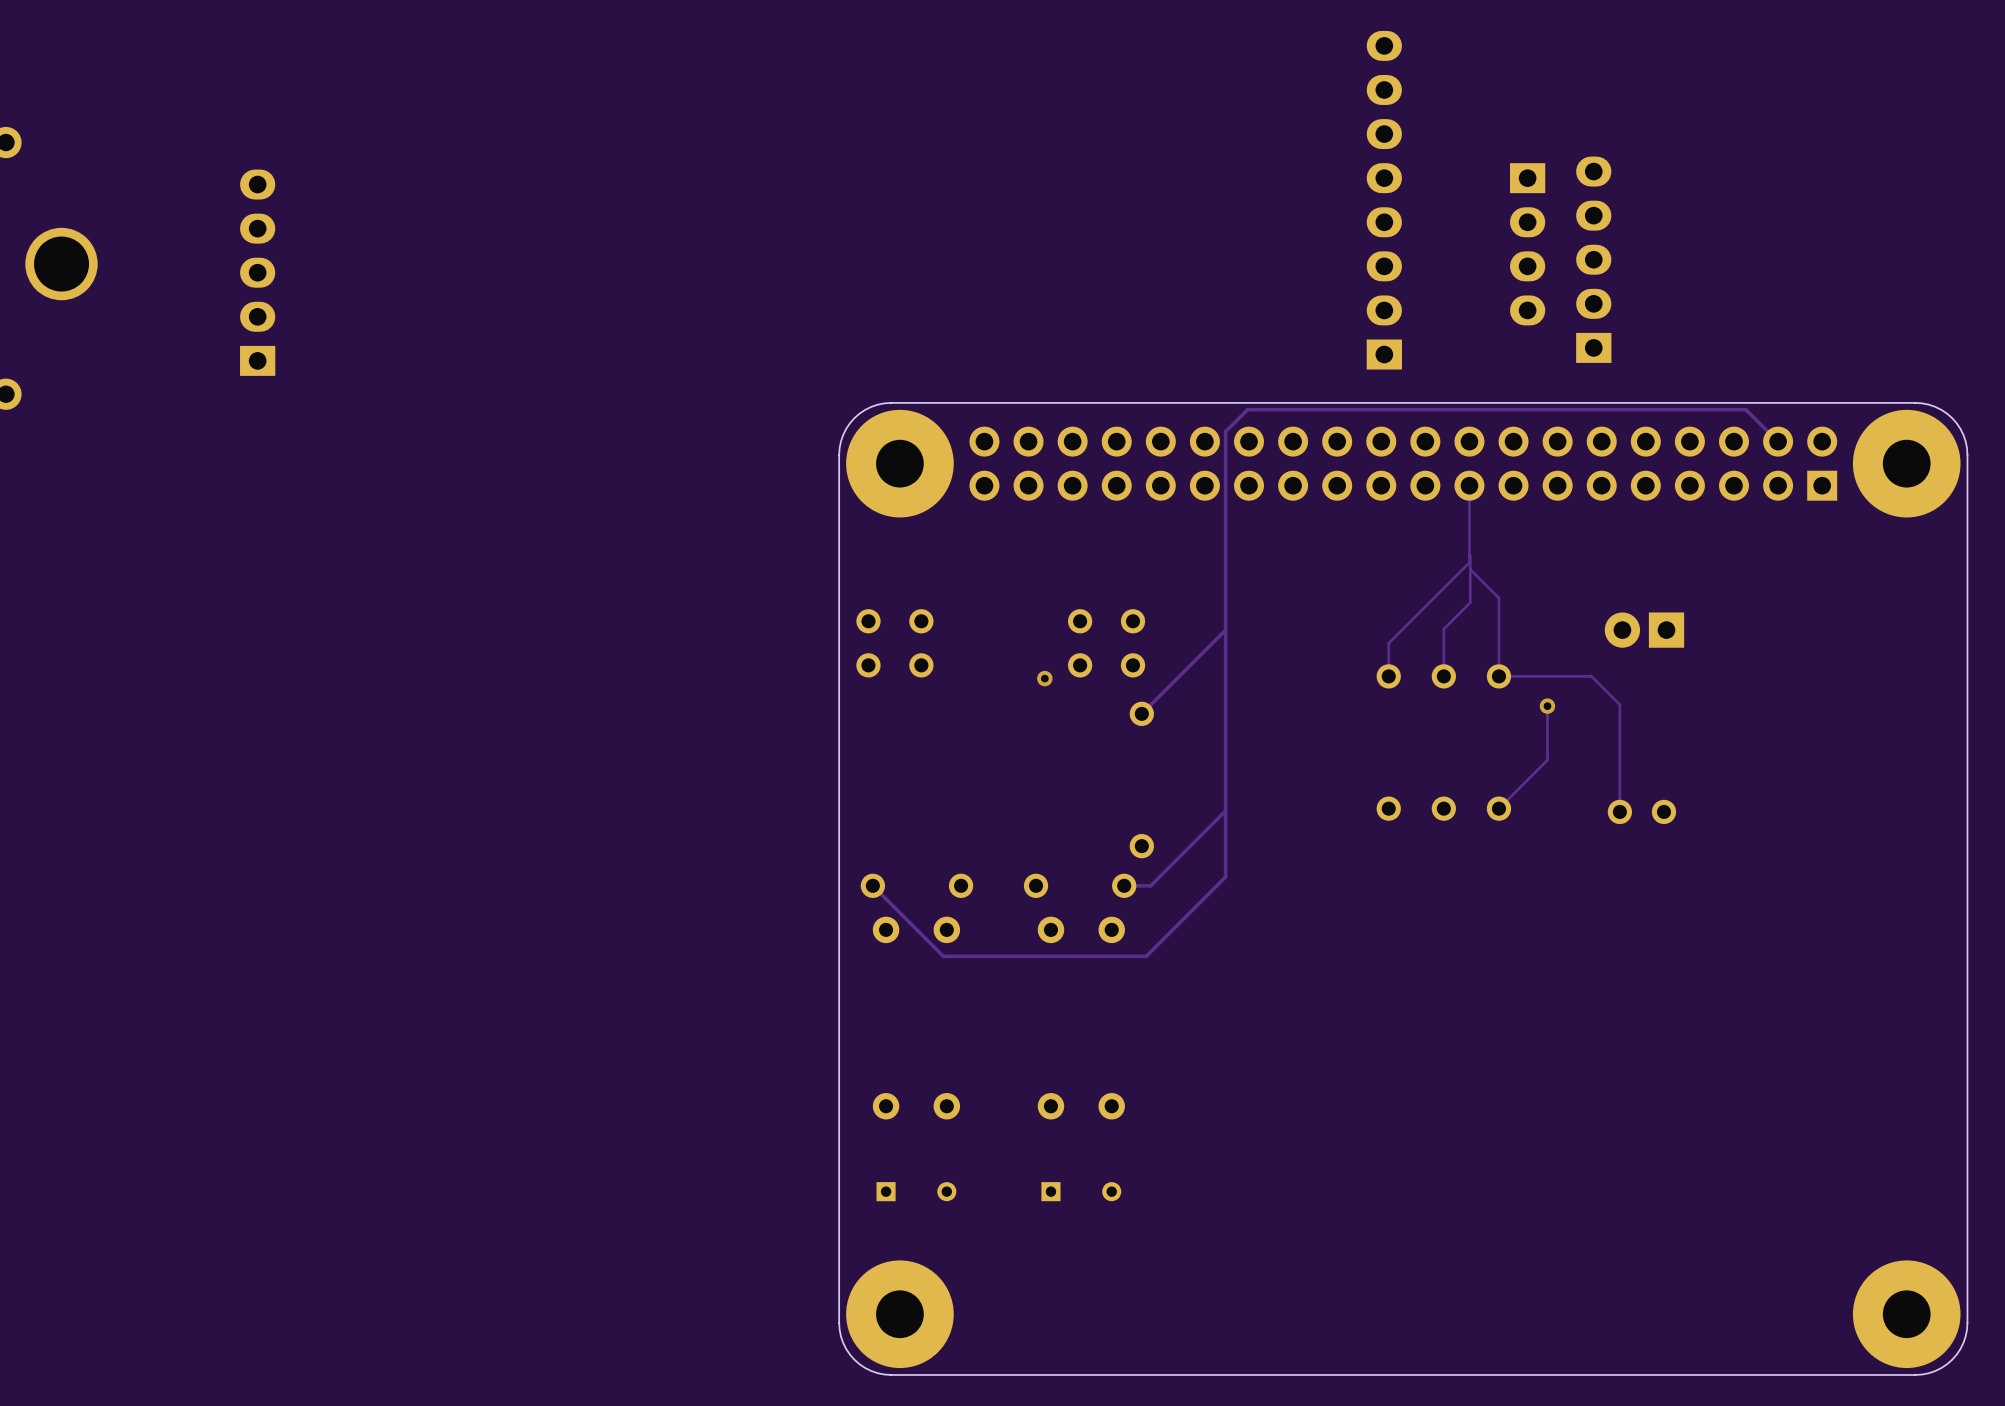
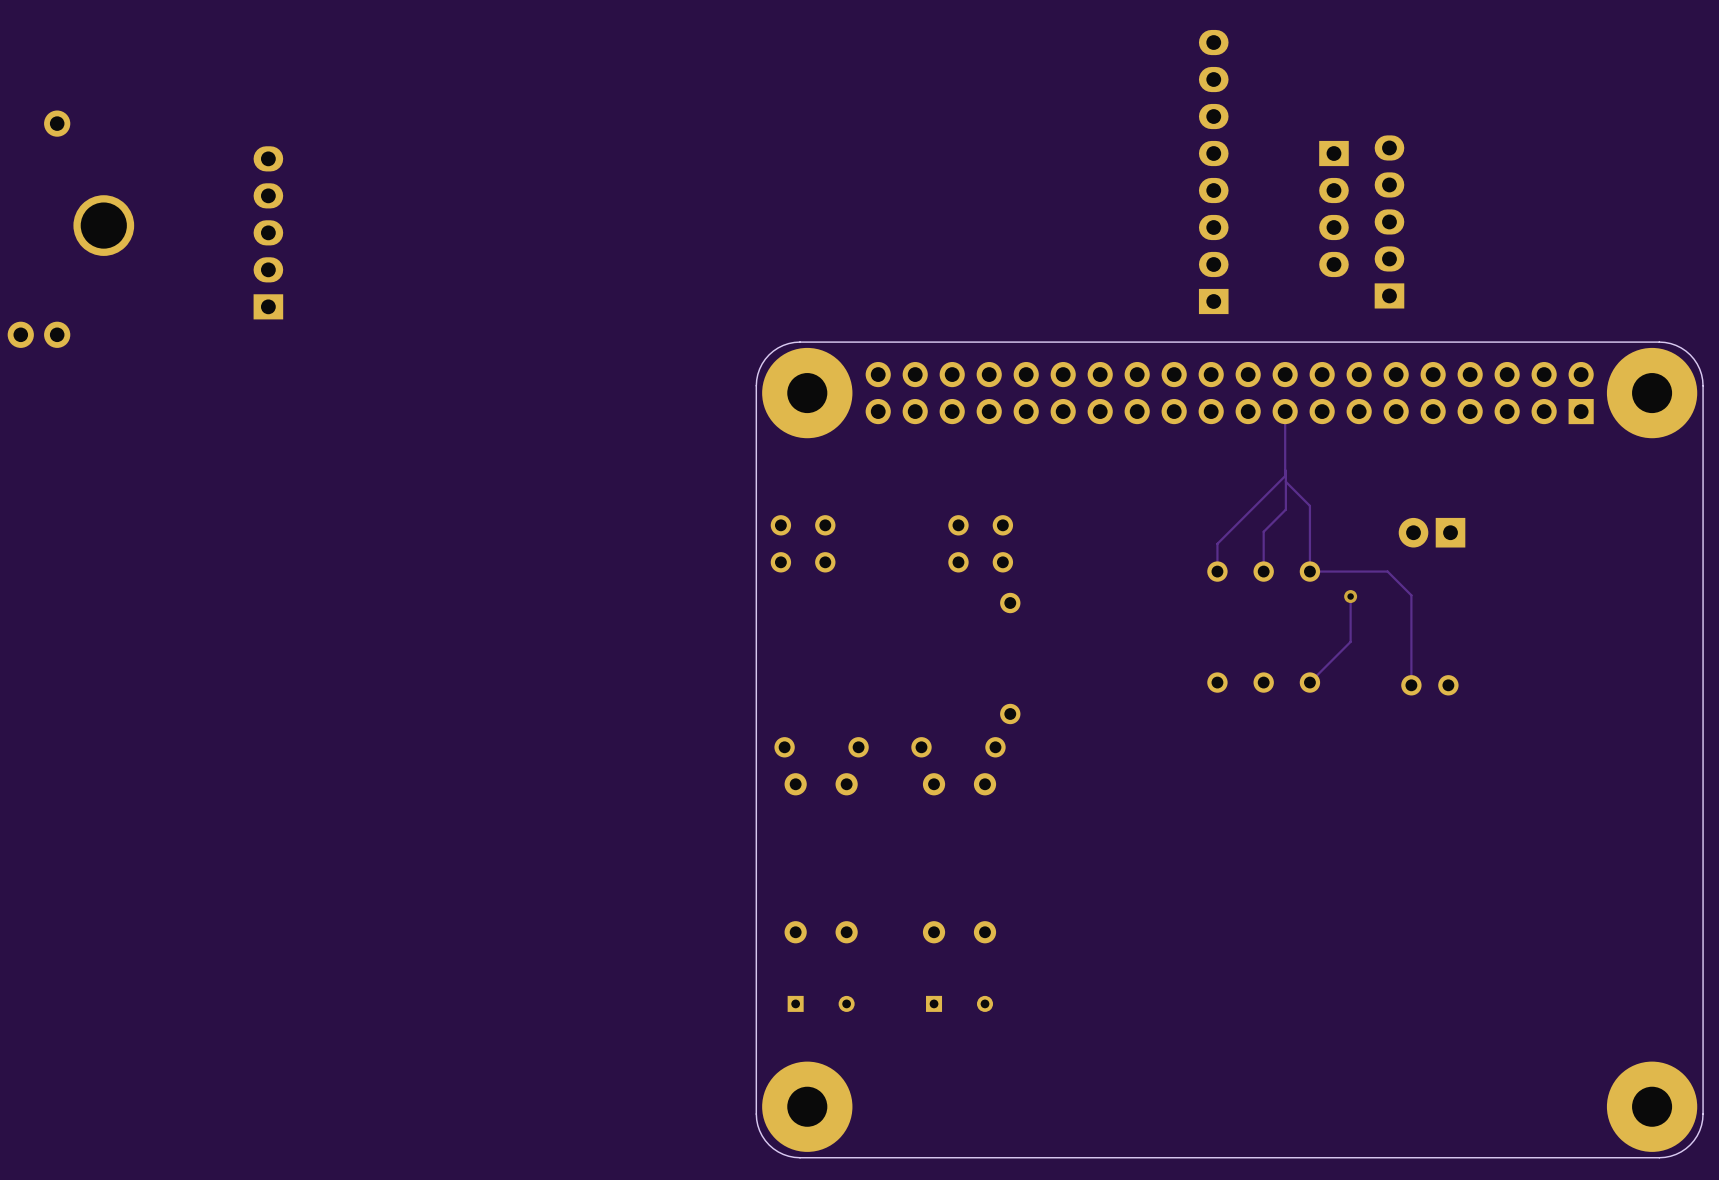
track: (1777, 441) (1745, 409) (1247, 409) (1225, 431) (1225, 877) (1146, 956) (943, 956) (872, 885) -> none
track: (1225, 630) (1141, 713) -> none
via: (1044, 678) -> none
track: (1225, 810) (1150, 885) (1124, 885) -> none

